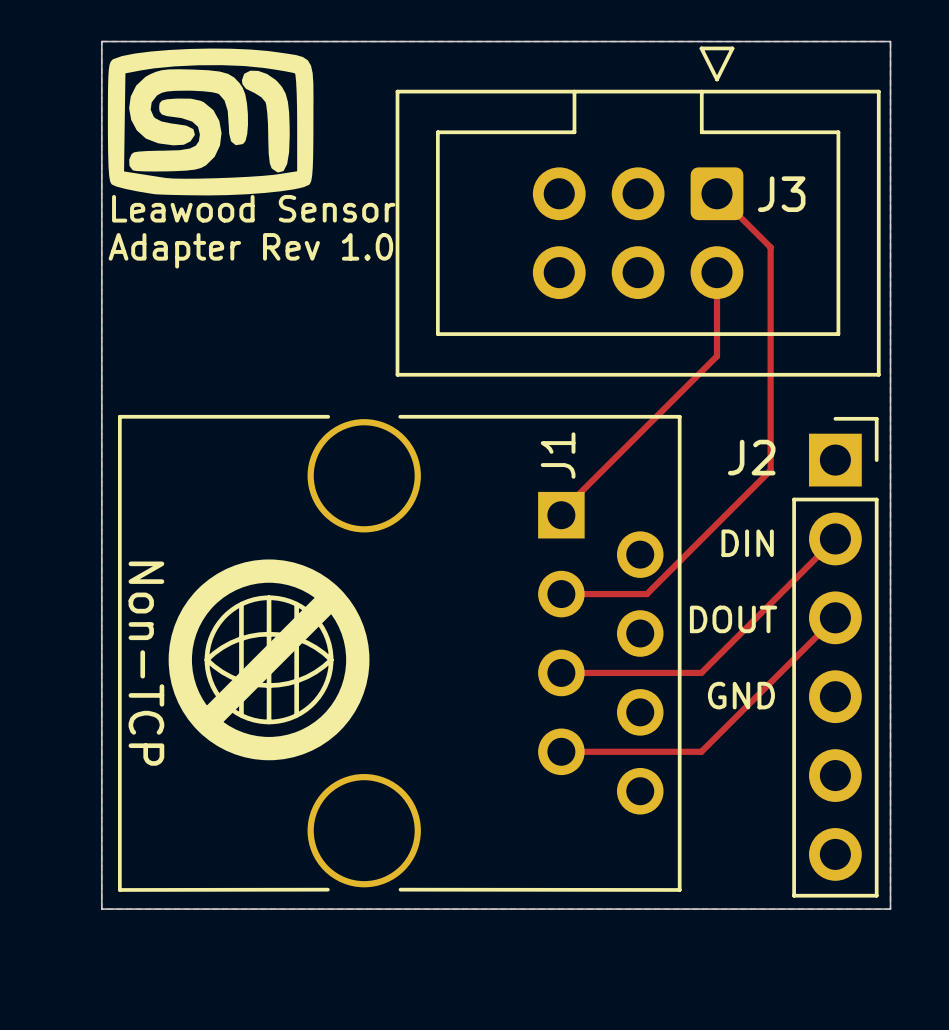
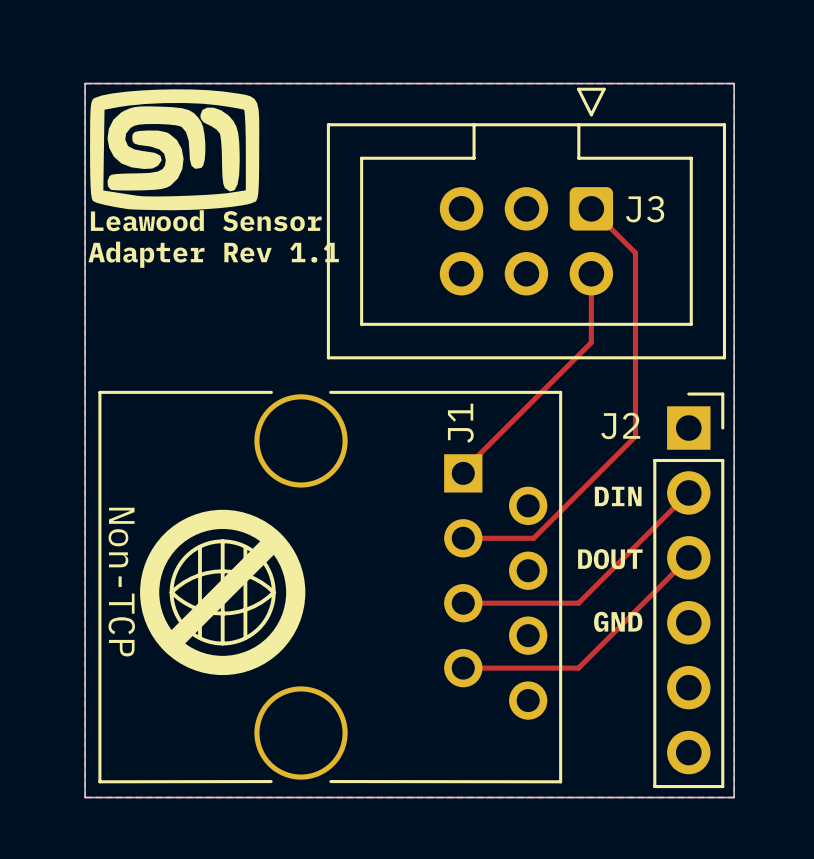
text: Adapter Rev 1.0 (250, 250) -> Adapter Rev 1.1 (213, 254)

